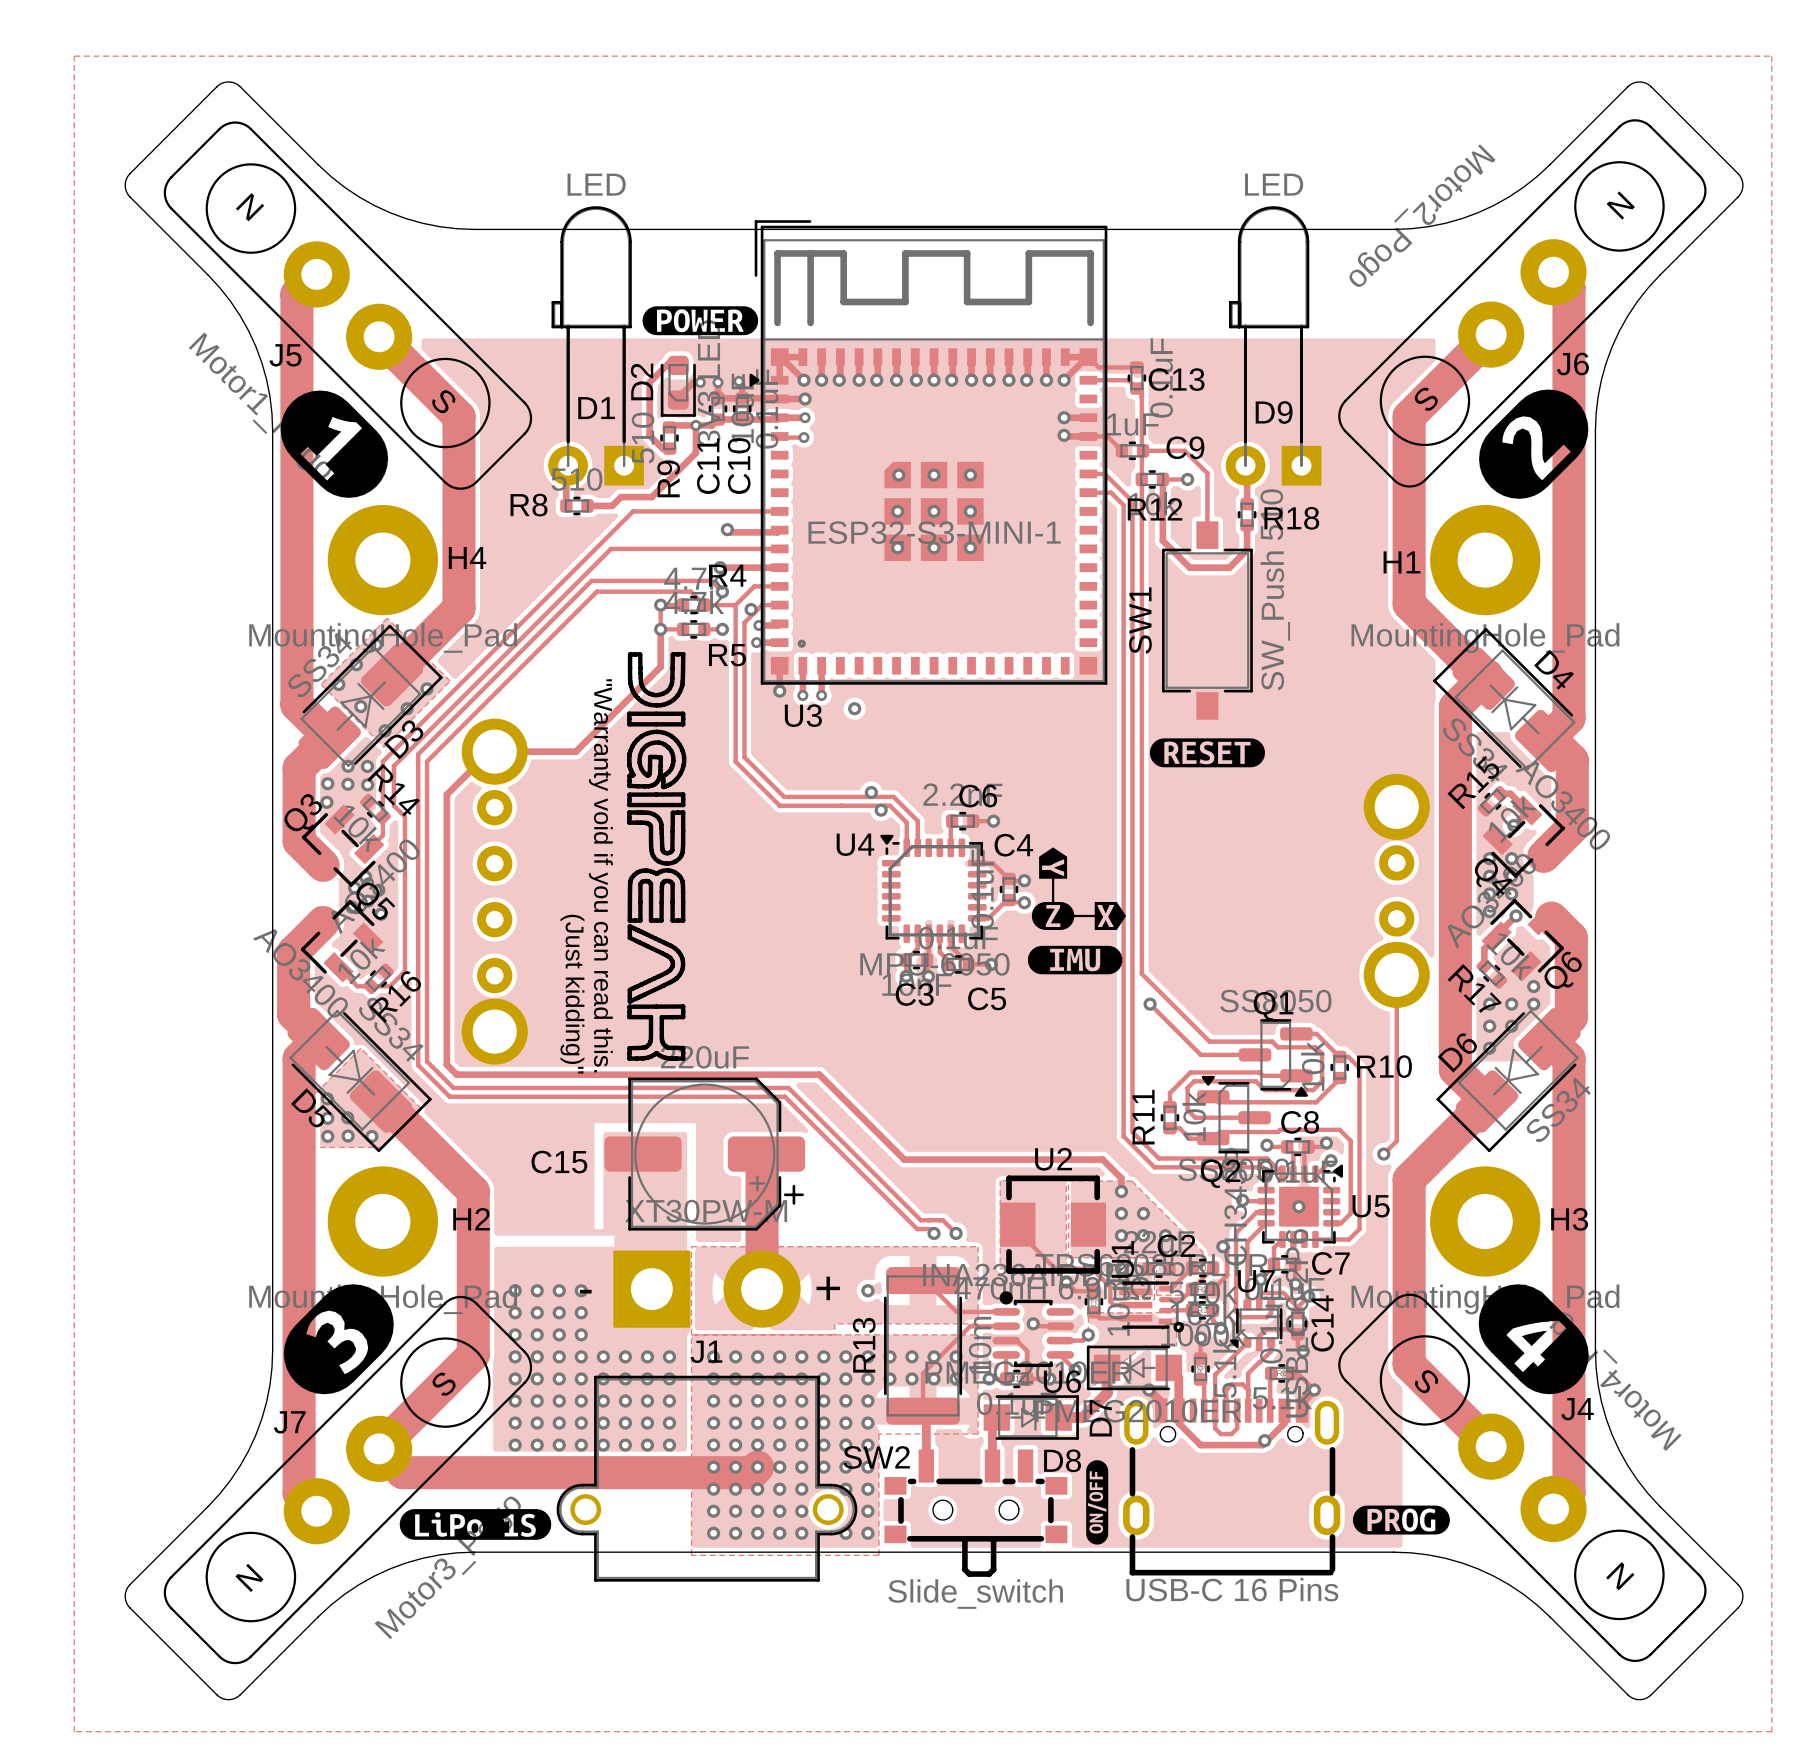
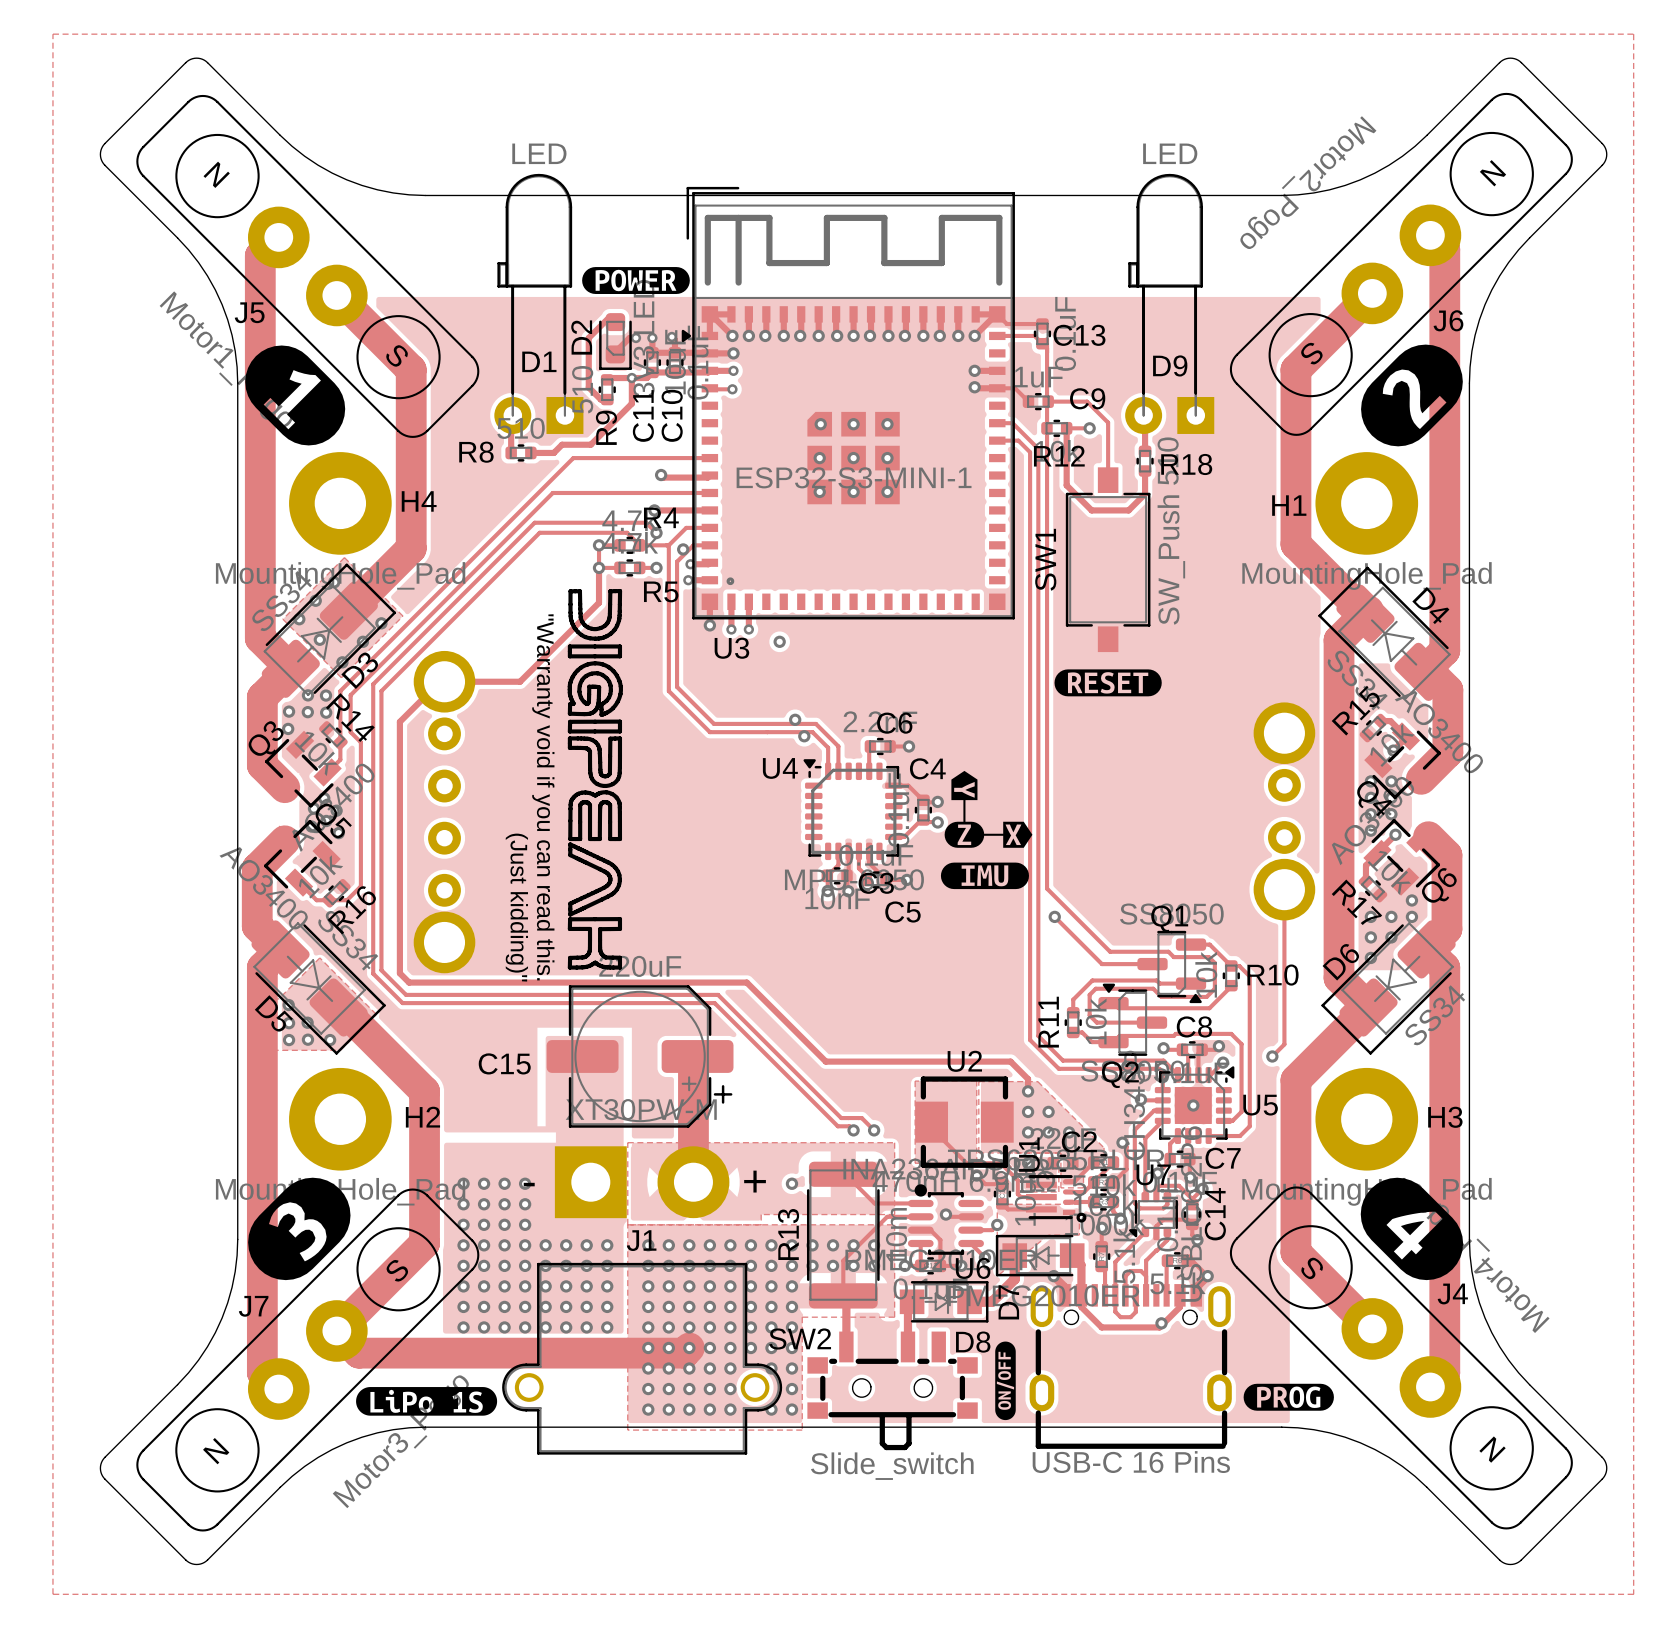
C3 name position: C3 (914, 994) -> C3 (876, 883)

